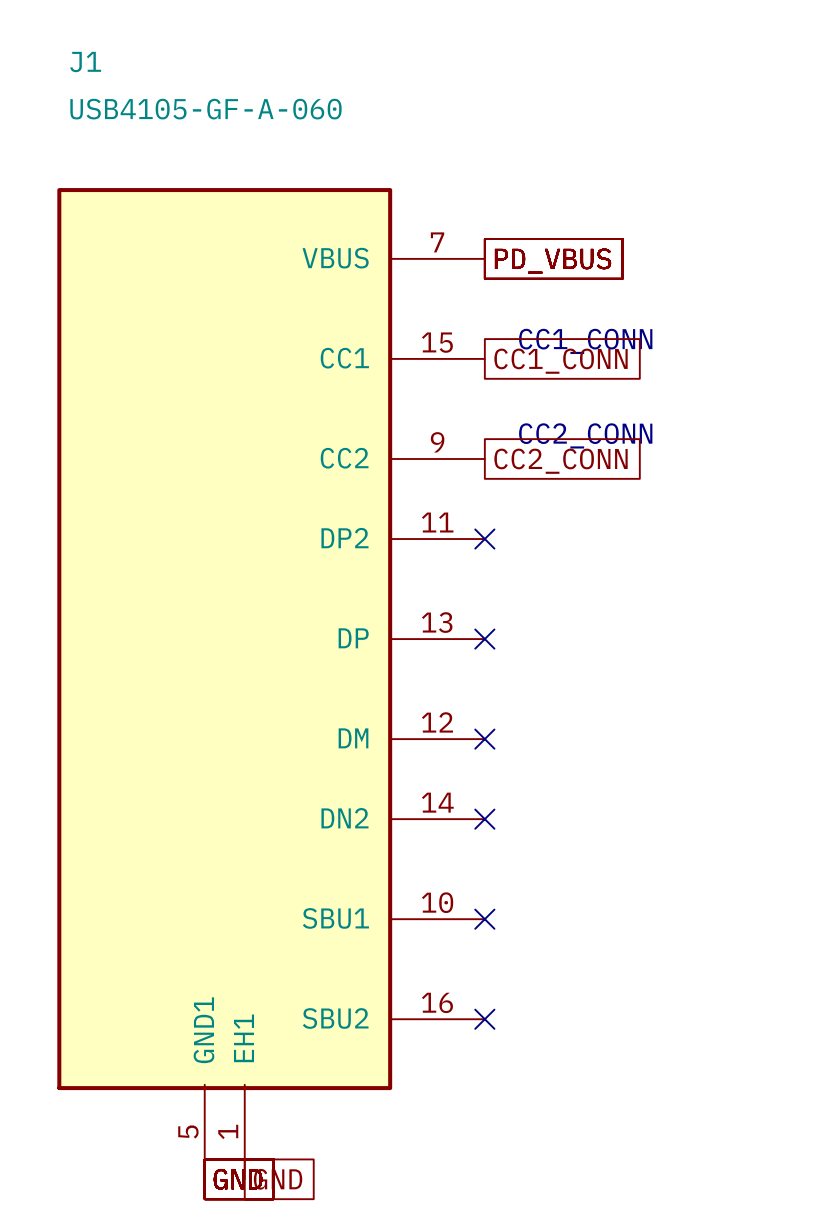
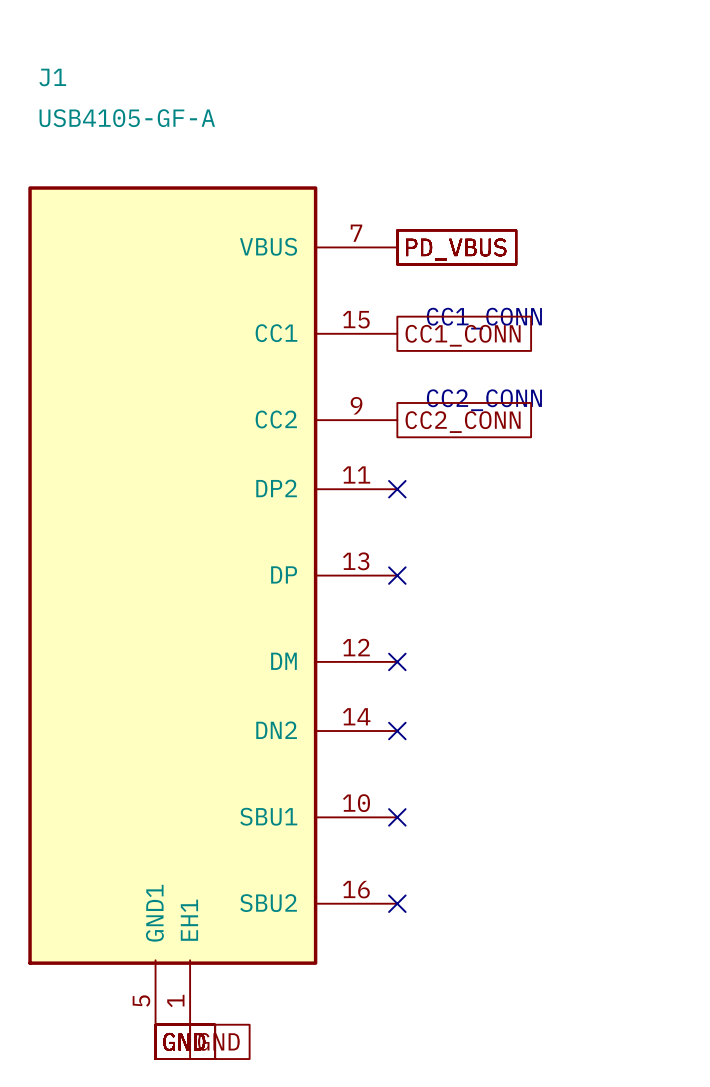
J1 value: USB4105-GF-A-060 (206, 109) -> USB4105-GF-A (127, 118)

